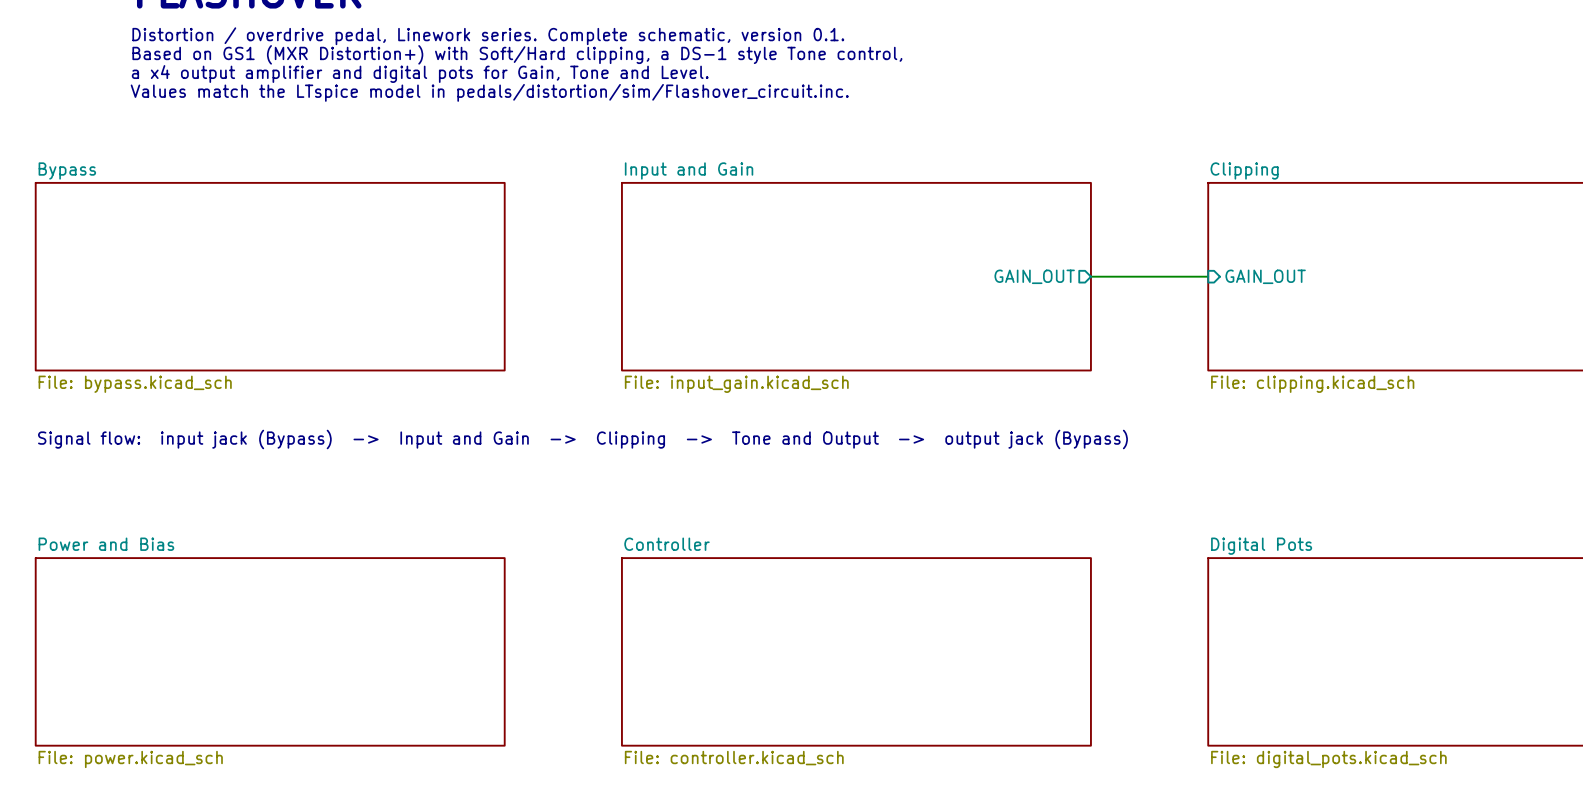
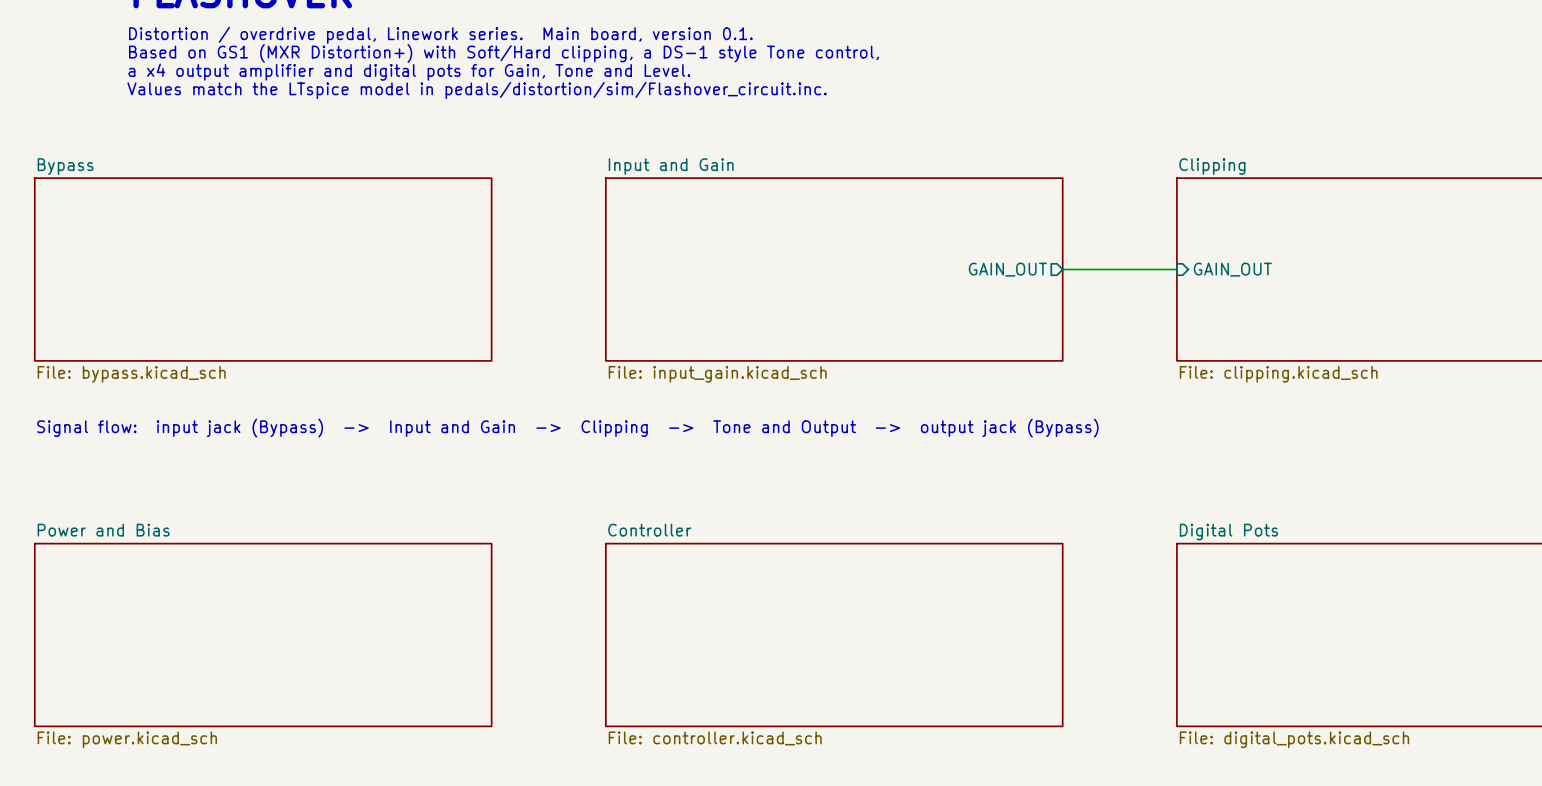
text: Distortion / overdrive pedal, Linework series. Complete schematic, version 0.1. (488, 36) -> Distortion / overdrive pedal, Linework series. Main board, version 0.1. (440, 35)

